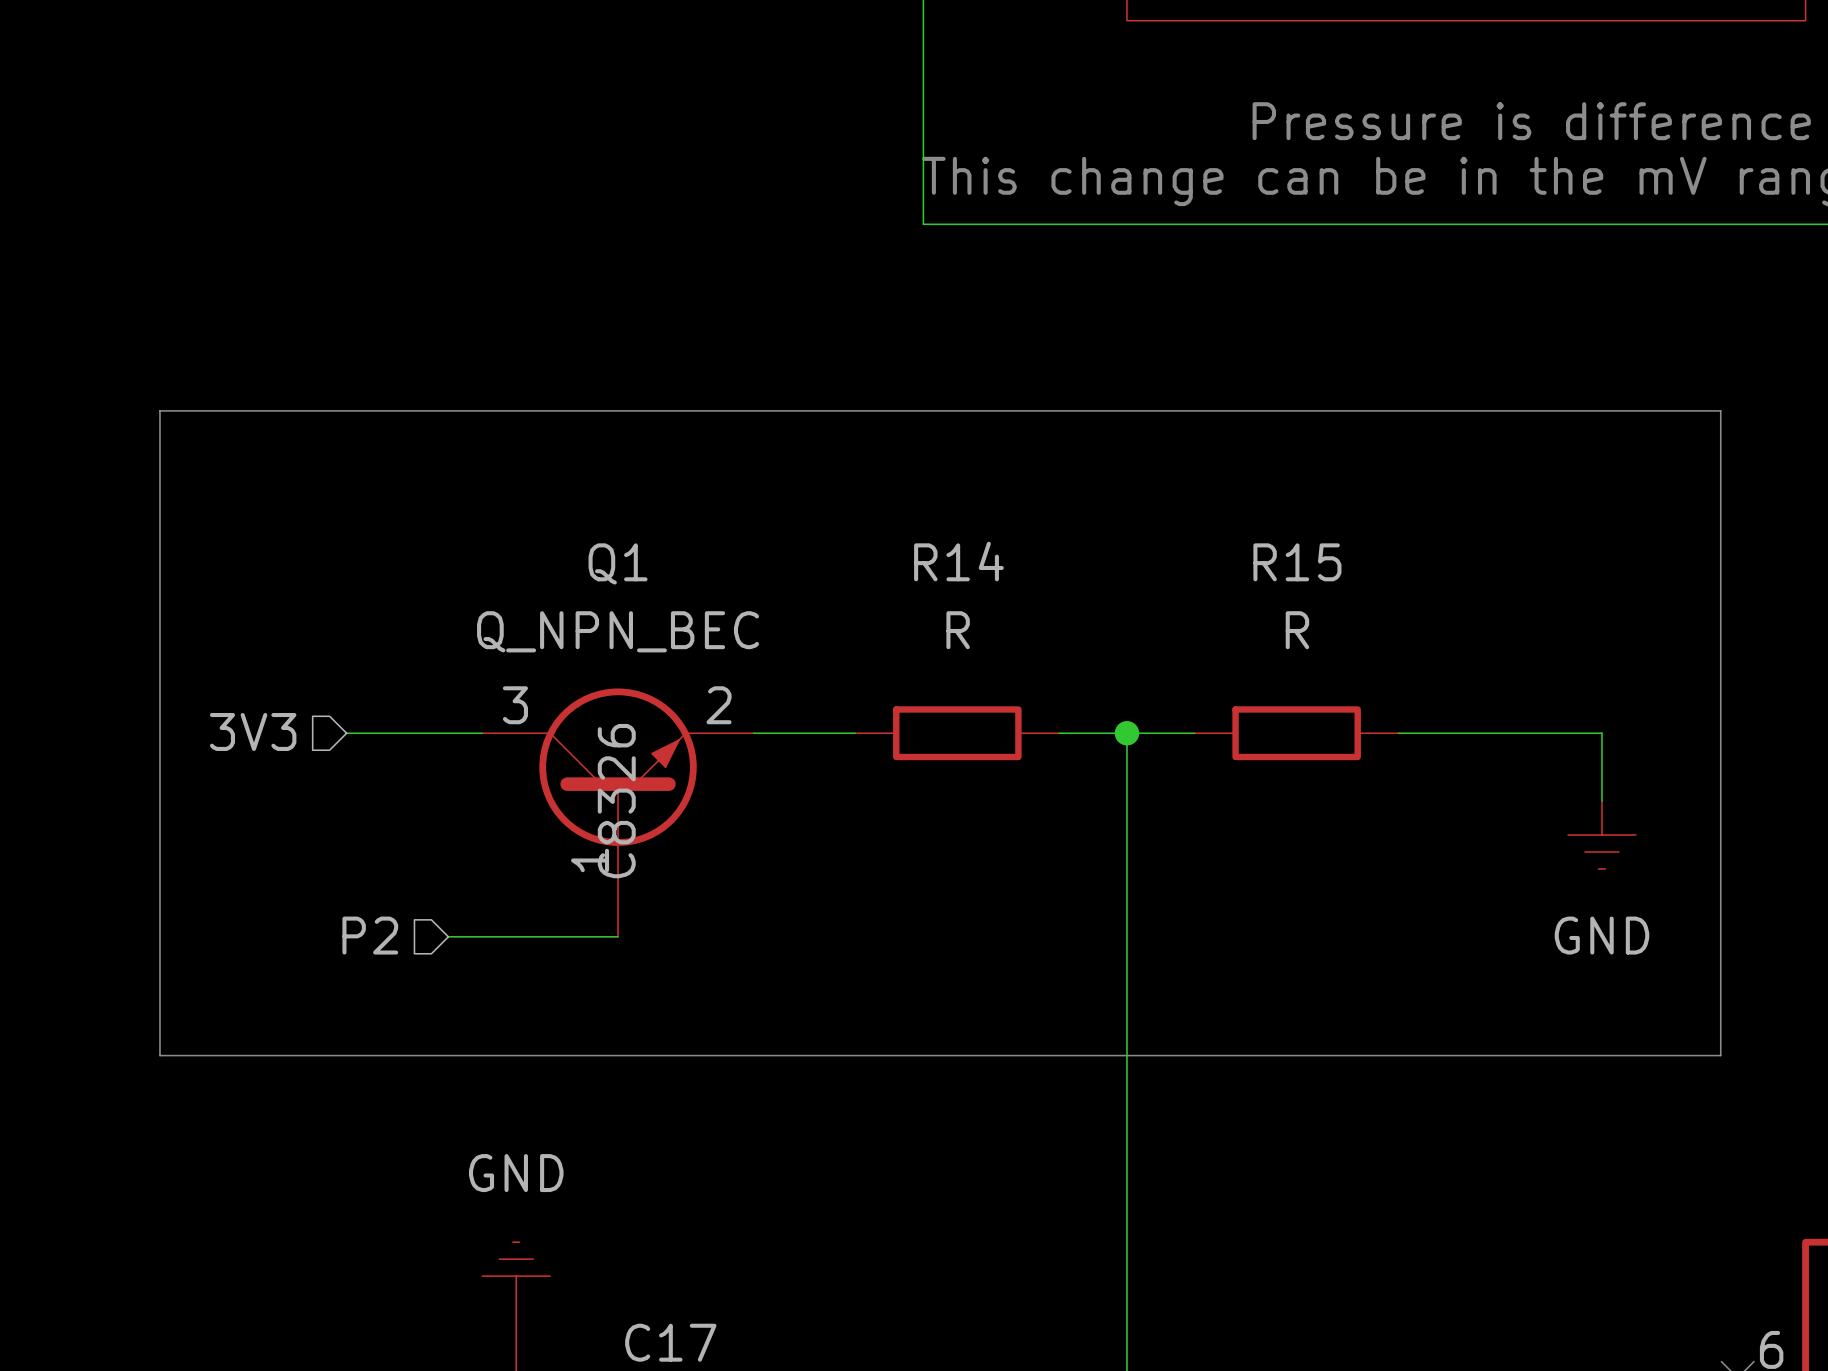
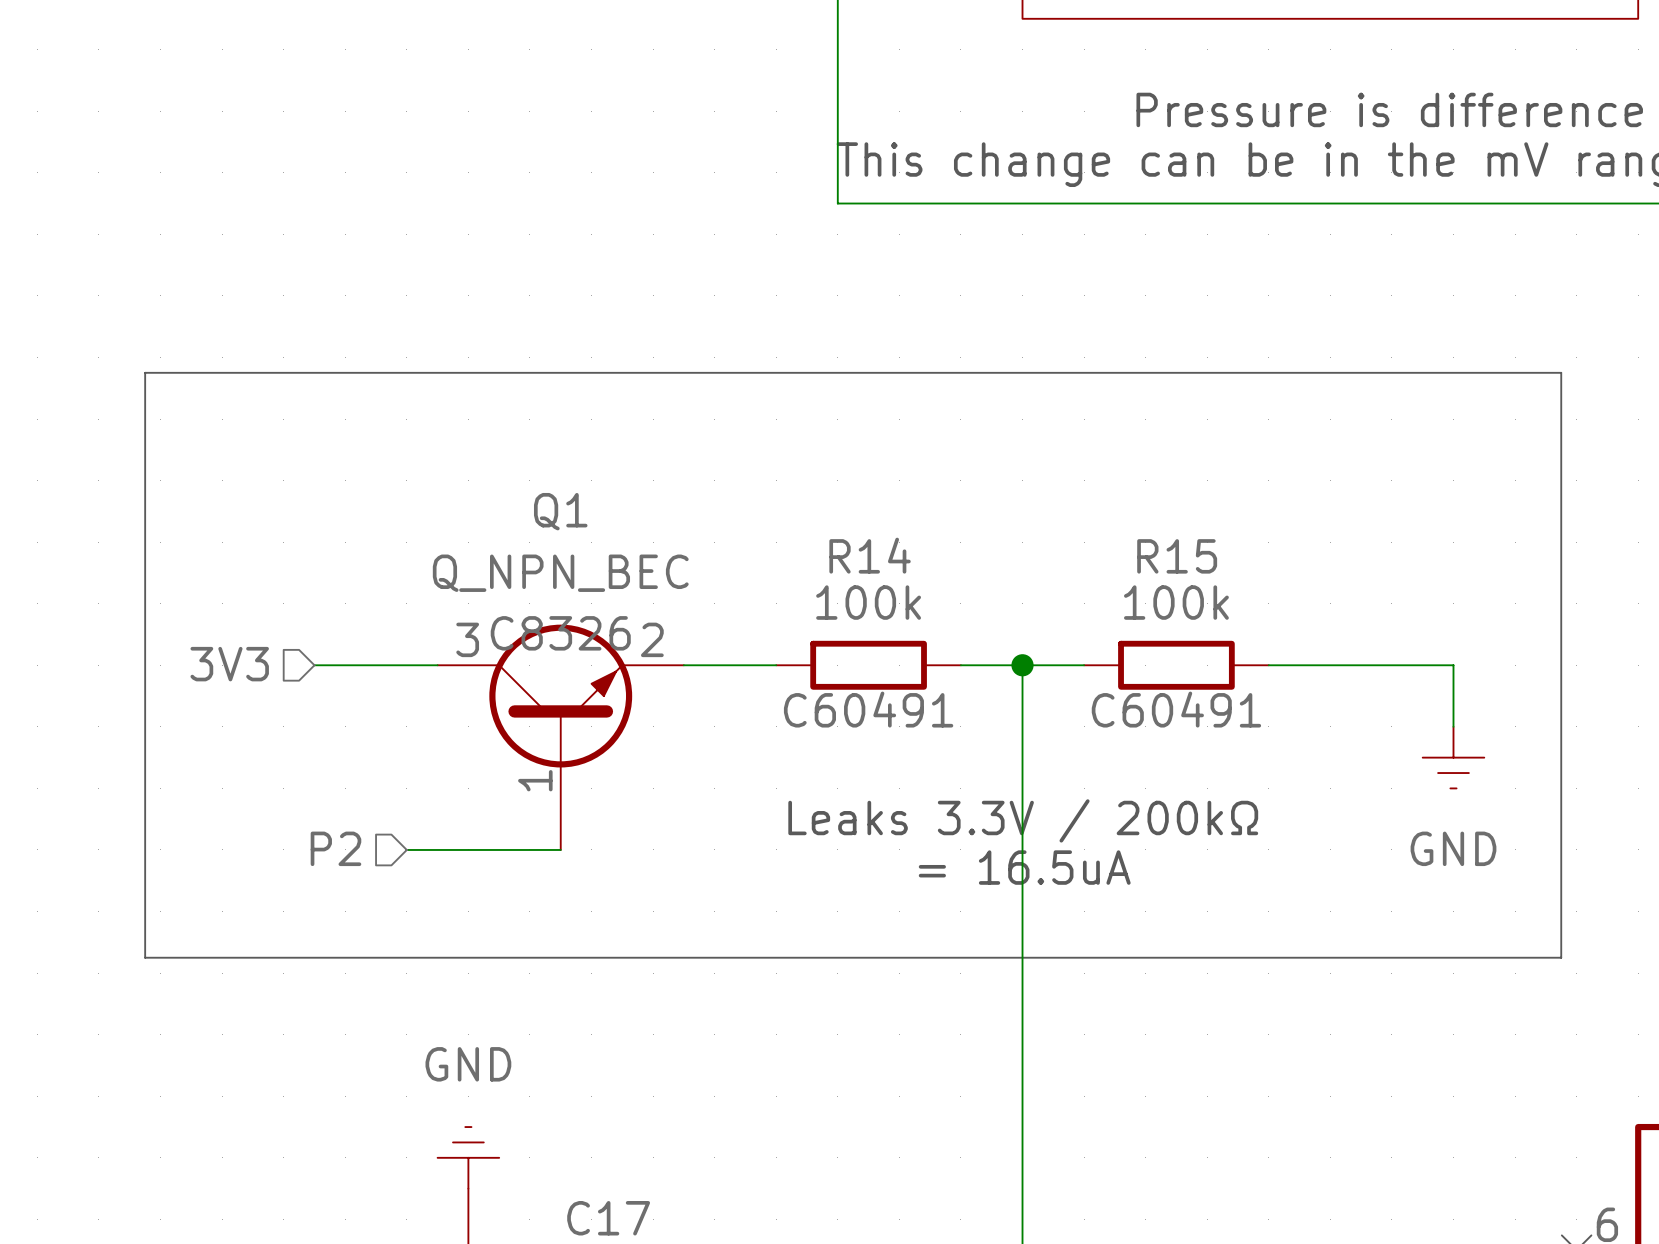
R14 name position: R14 (958, 561) -> R14 (870, 555)
R15 name position: R15 (1297, 562) -> R15 (1177, 556)
R14 value: R (958, 630) -> 100k (868, 602)
R15 value: R (1297, 630) -> 100k (1176, 602)
R14 text: none -> C60491 (868, 709)
R15 text: none -> C60491 (1176, 709)
Q1 text rotation: 0° (616, 801) -> 90° clockwise (560, 633)
text: none -> Leaks 3.3V / 200kΩ (1023, 820)
text: none -> = 16.5uA (1024, 867)

